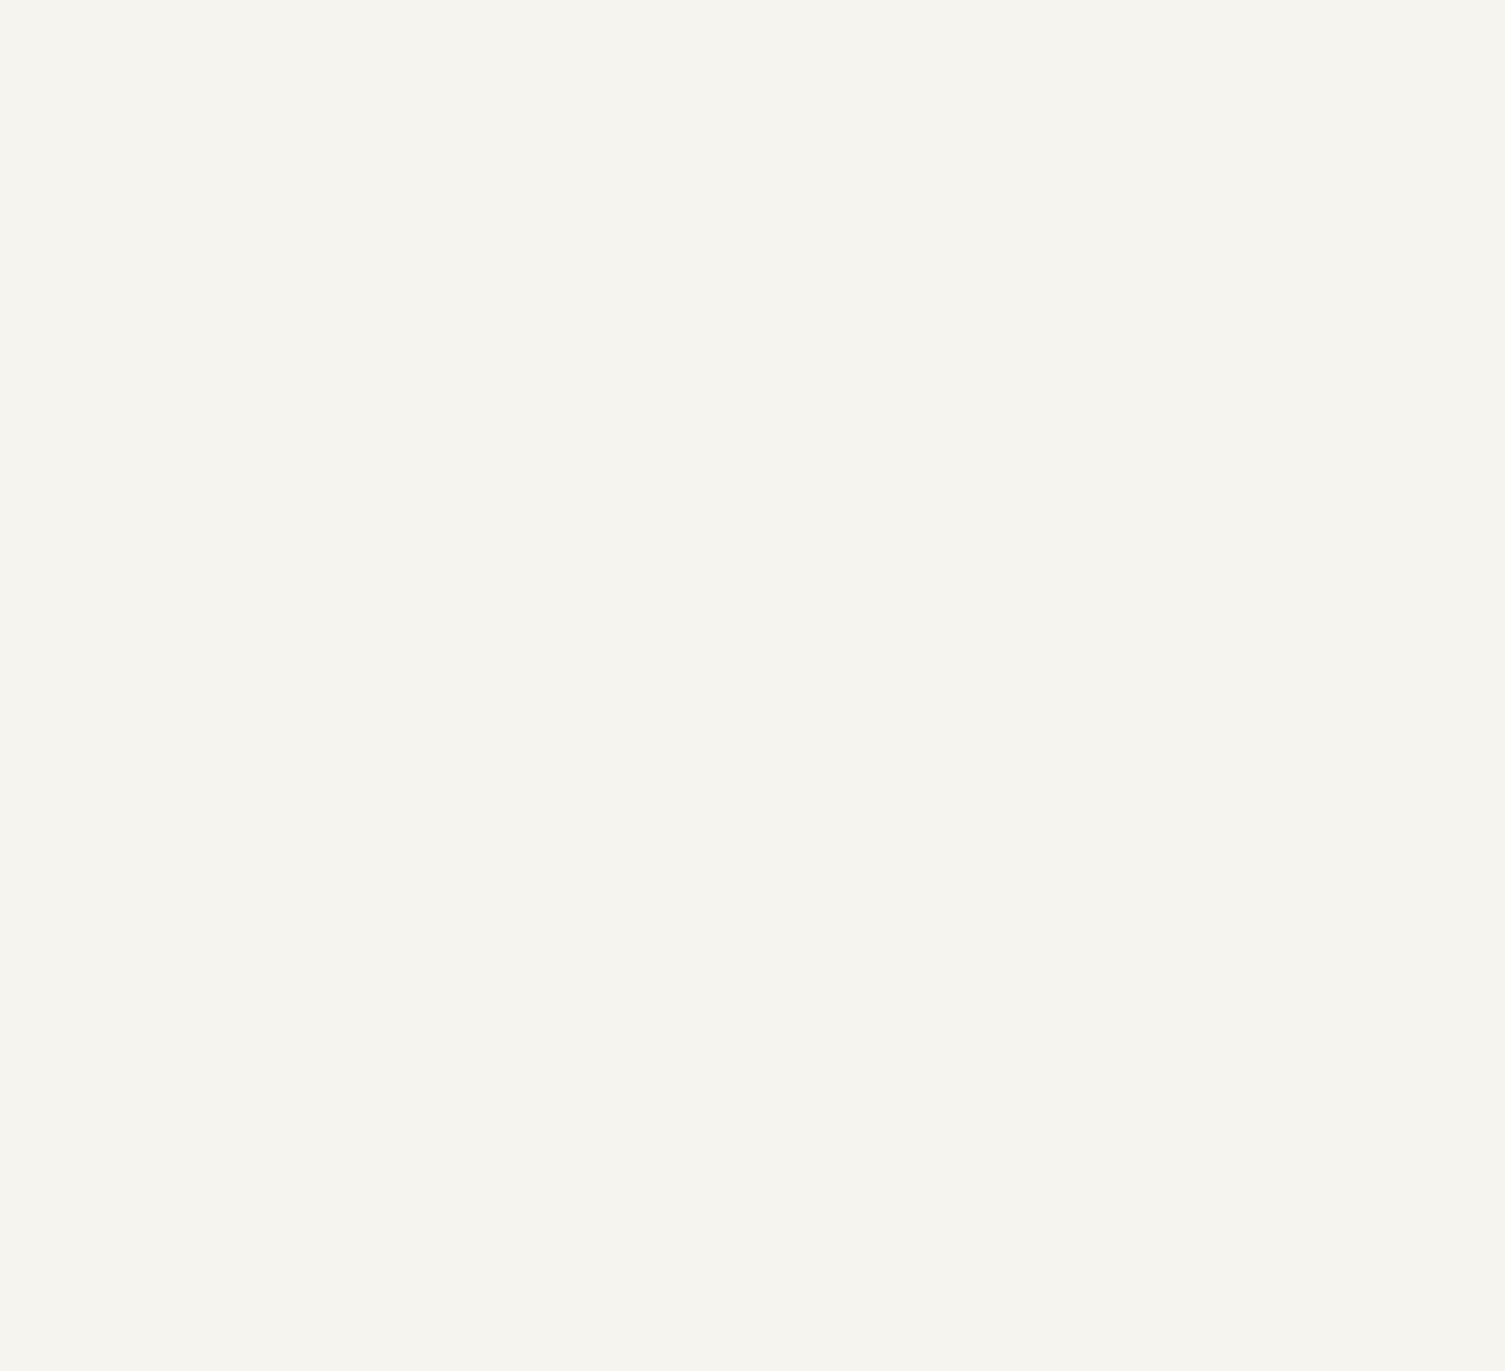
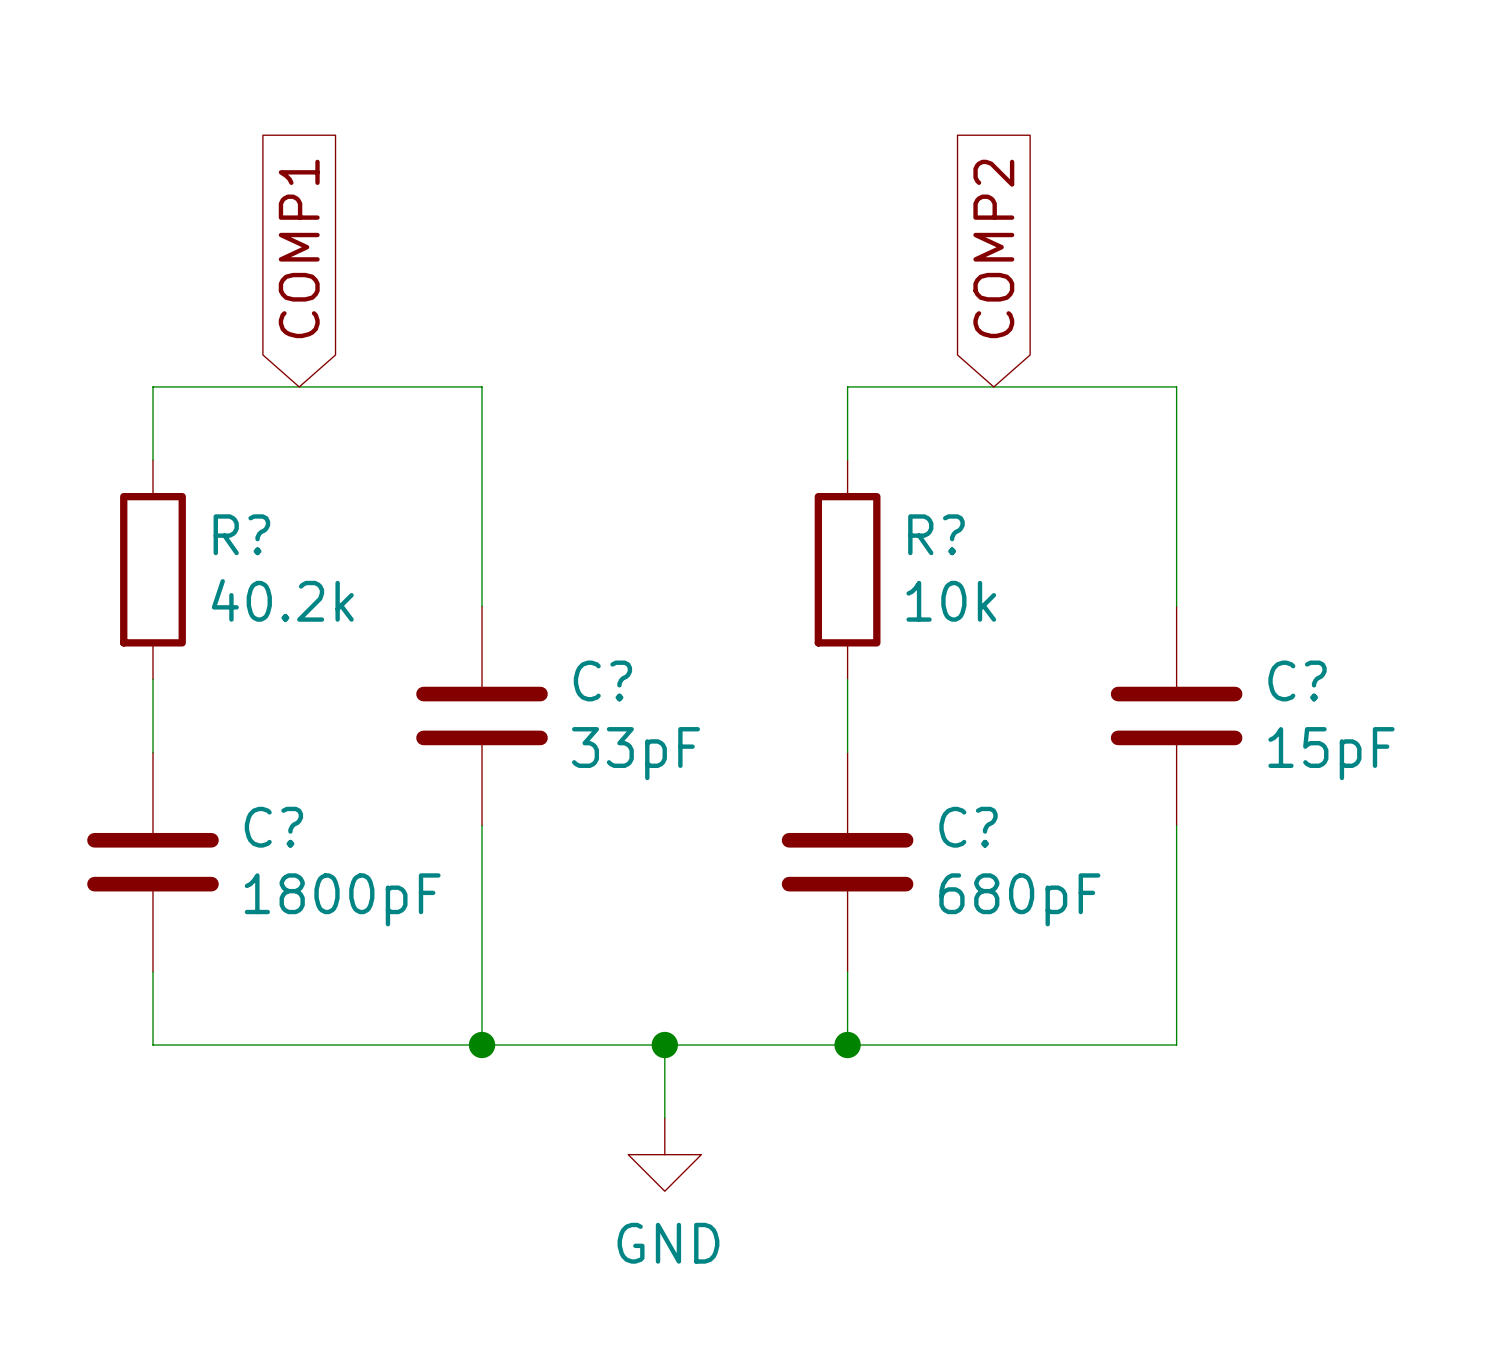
global label: none -> COMP1 (299, 248)
global label: none -> COMP2 (993, 248)
wire: none -> (152, 460) (152, 386) (482, 386) (482, 606)
wire: none -> (847, 460) (847, 386) (1176, 386) (1176, 606)
R?: none -> 40.2k (152, 569)
R?: none -> 10k (847, 569)
wire: none -> (152, 679) (152, 752)
wire: none -> (847, 679) (847, 752)
C?: none -> 33pF (482, 715)
C?: none -> 15pF (1176, 715)
wire: none -> (482, 825) (482, 1045)
wire: none -> (1176, 825) (1176, 1045) (152, 1045) (152, 971)
C?: none -> 1800pF (152, 862)
C?: none -> 680pF (847, 862)
wire: none -> (847, 971) (847, 1045)
junction: none -> (482, 1045)
wire: none -> (664, 1045) (664, 1118)
junction: none -> (664, 1045)
junction: none -> (847, 1045)
power symbol: none -> GND (664, 1154)

